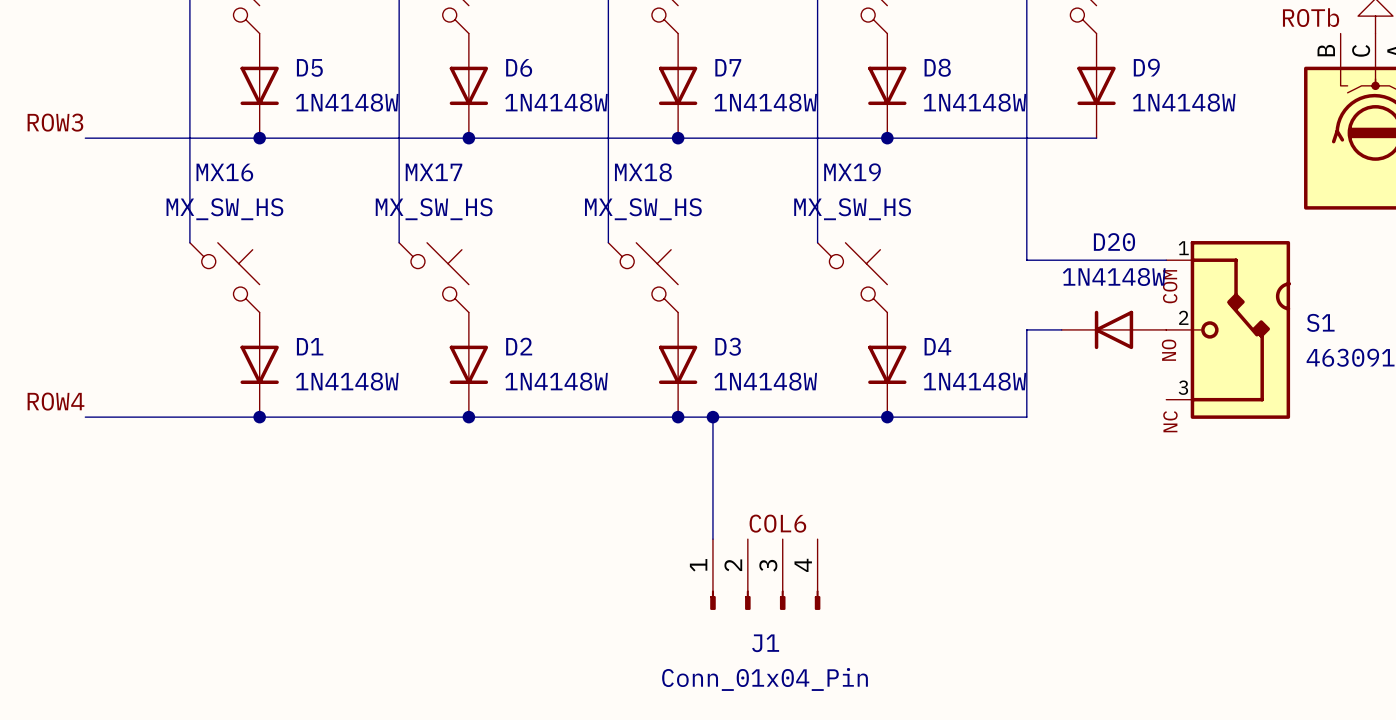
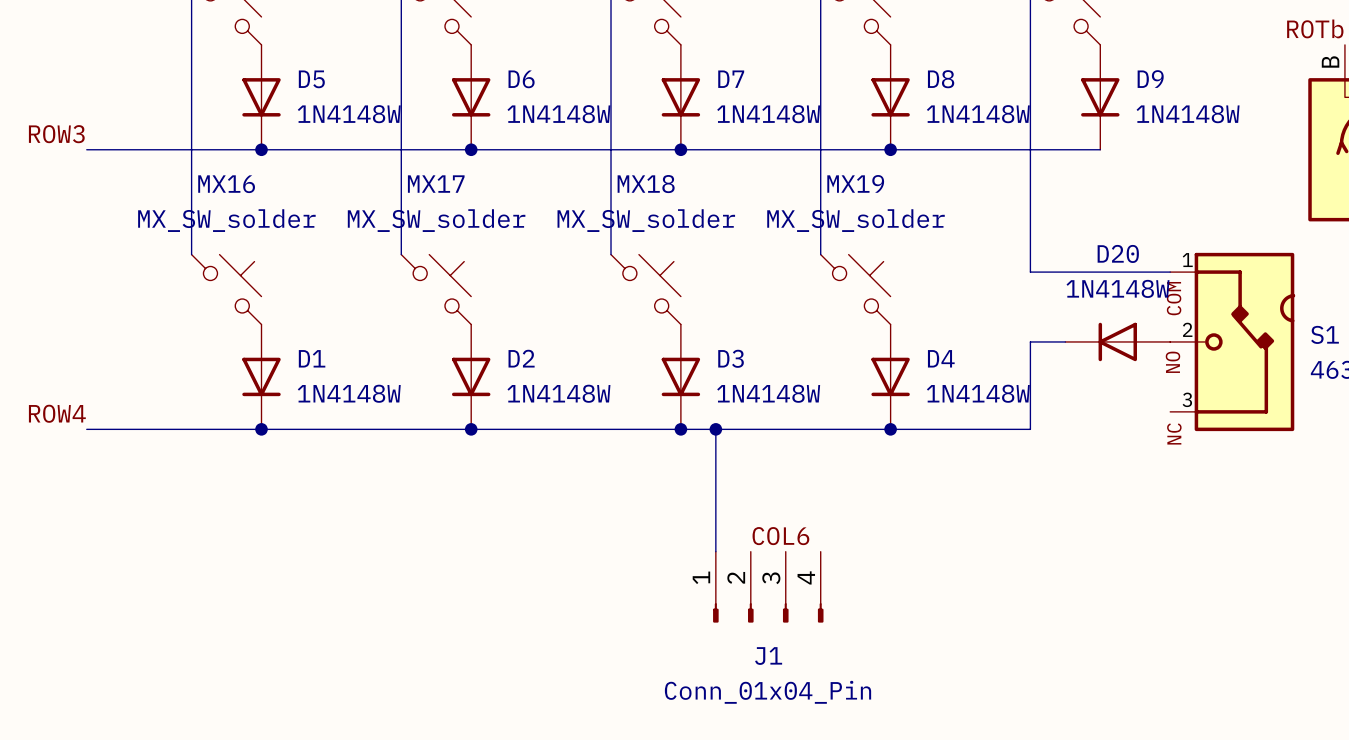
MX16 value: MX_SW_HS (224, 209) -> MX_SW_solder (226, 220)
MX17 value: MX_SW_HS (434, 209) -> MX_SW_solder (436, 220)
MX18 value: MX_SW_HS (643, 209) -> MX_SW_solder (646, 220)
MX19 value: MX_SW_HS (852, 209) -> MX_SW_solder (855, 220)

